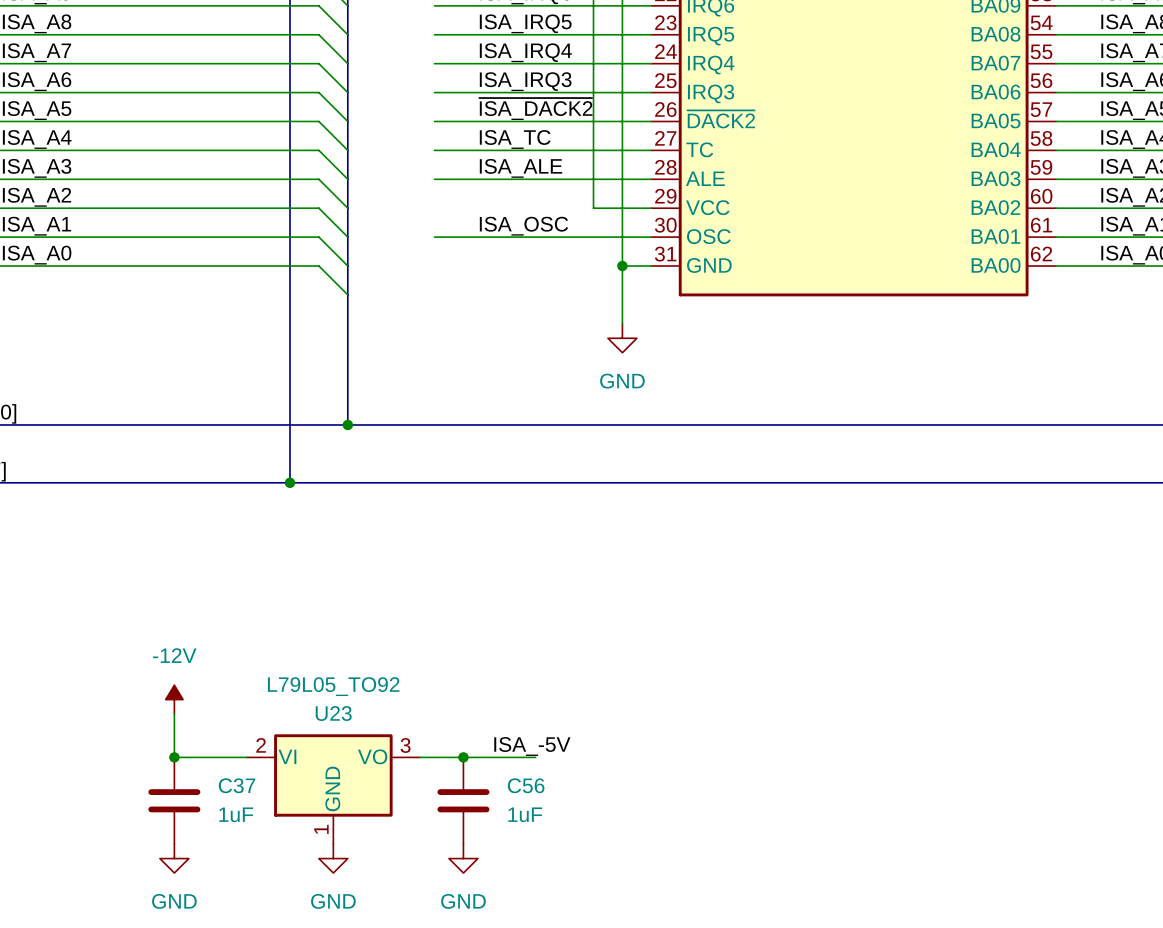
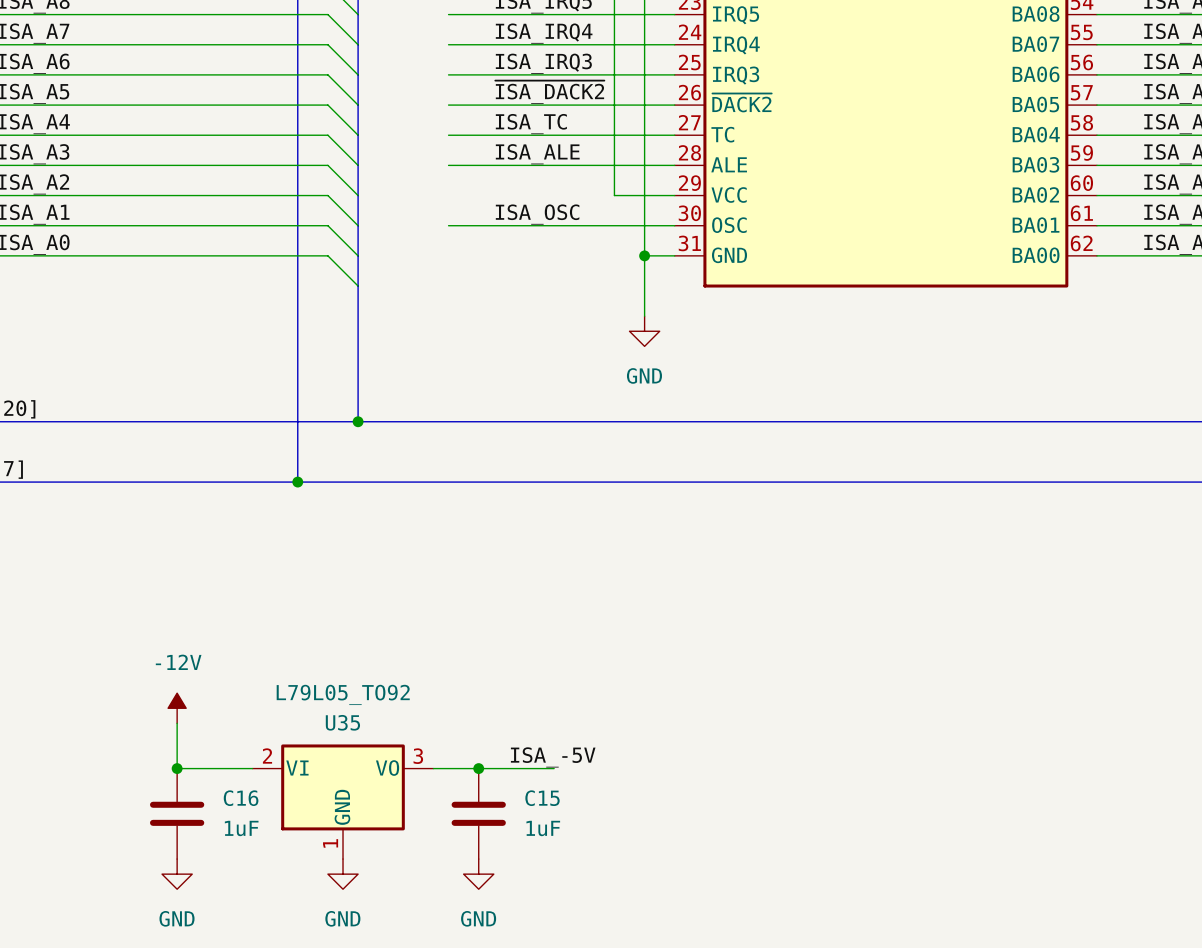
U23 name: U23 (333, 713) -> U35 (342, 722)
C37 name: C37 (237, 785) -> C16 (241, 798)
C56 name: C56 (526, 785) -> C15 (542, 798)

